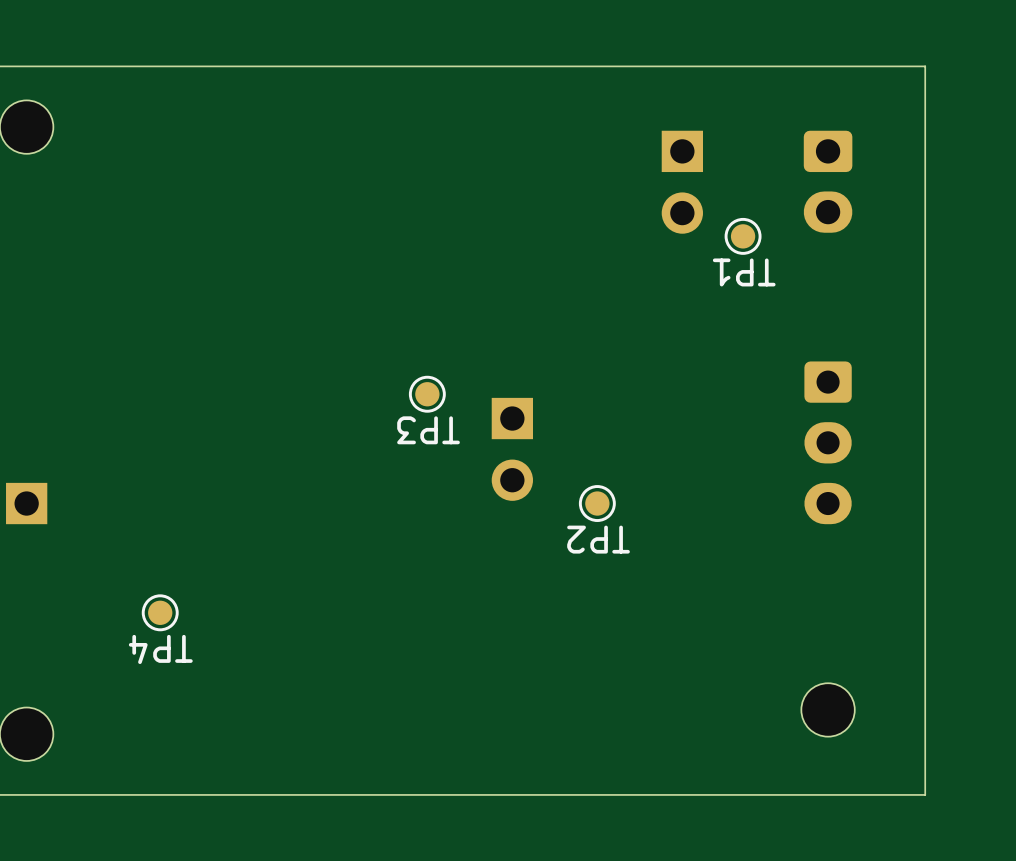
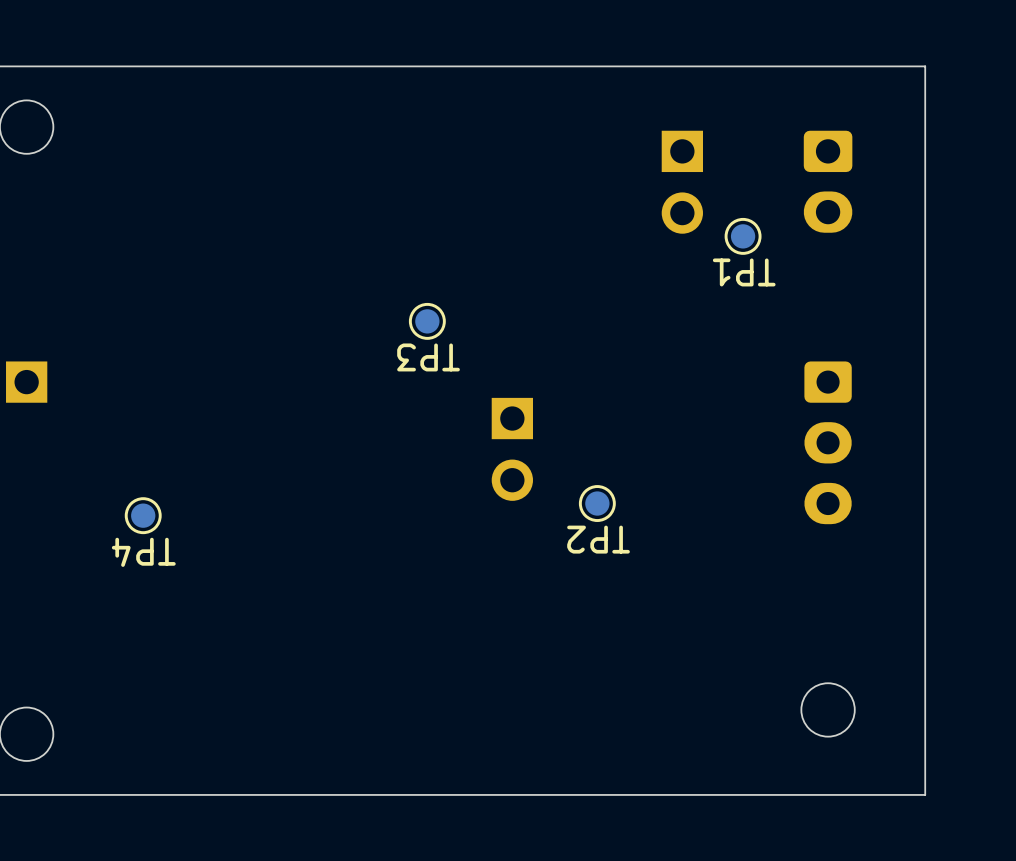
TP3 position: (427, 394) -> (427, 321)
part position: (26, 503) -> (26, 382)
TP4 position: (160, 612) -> (143, 515)

